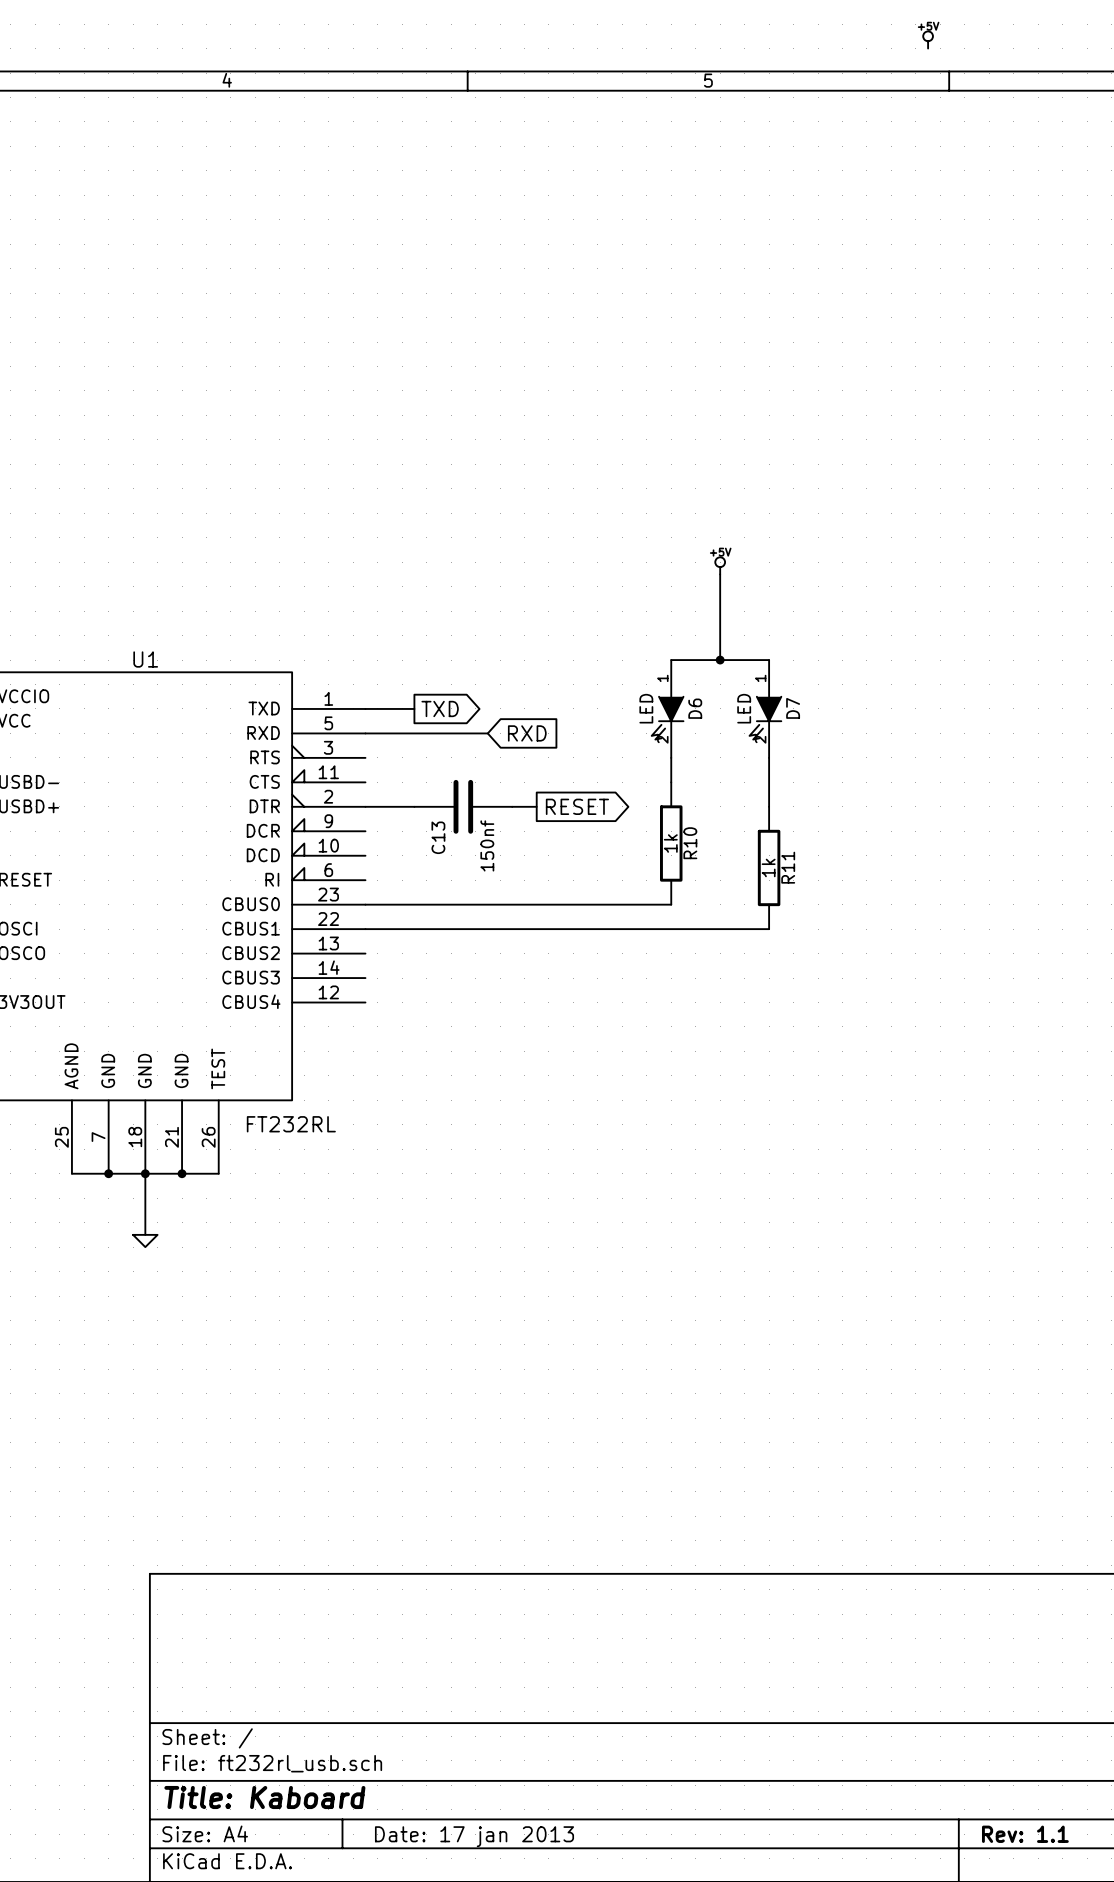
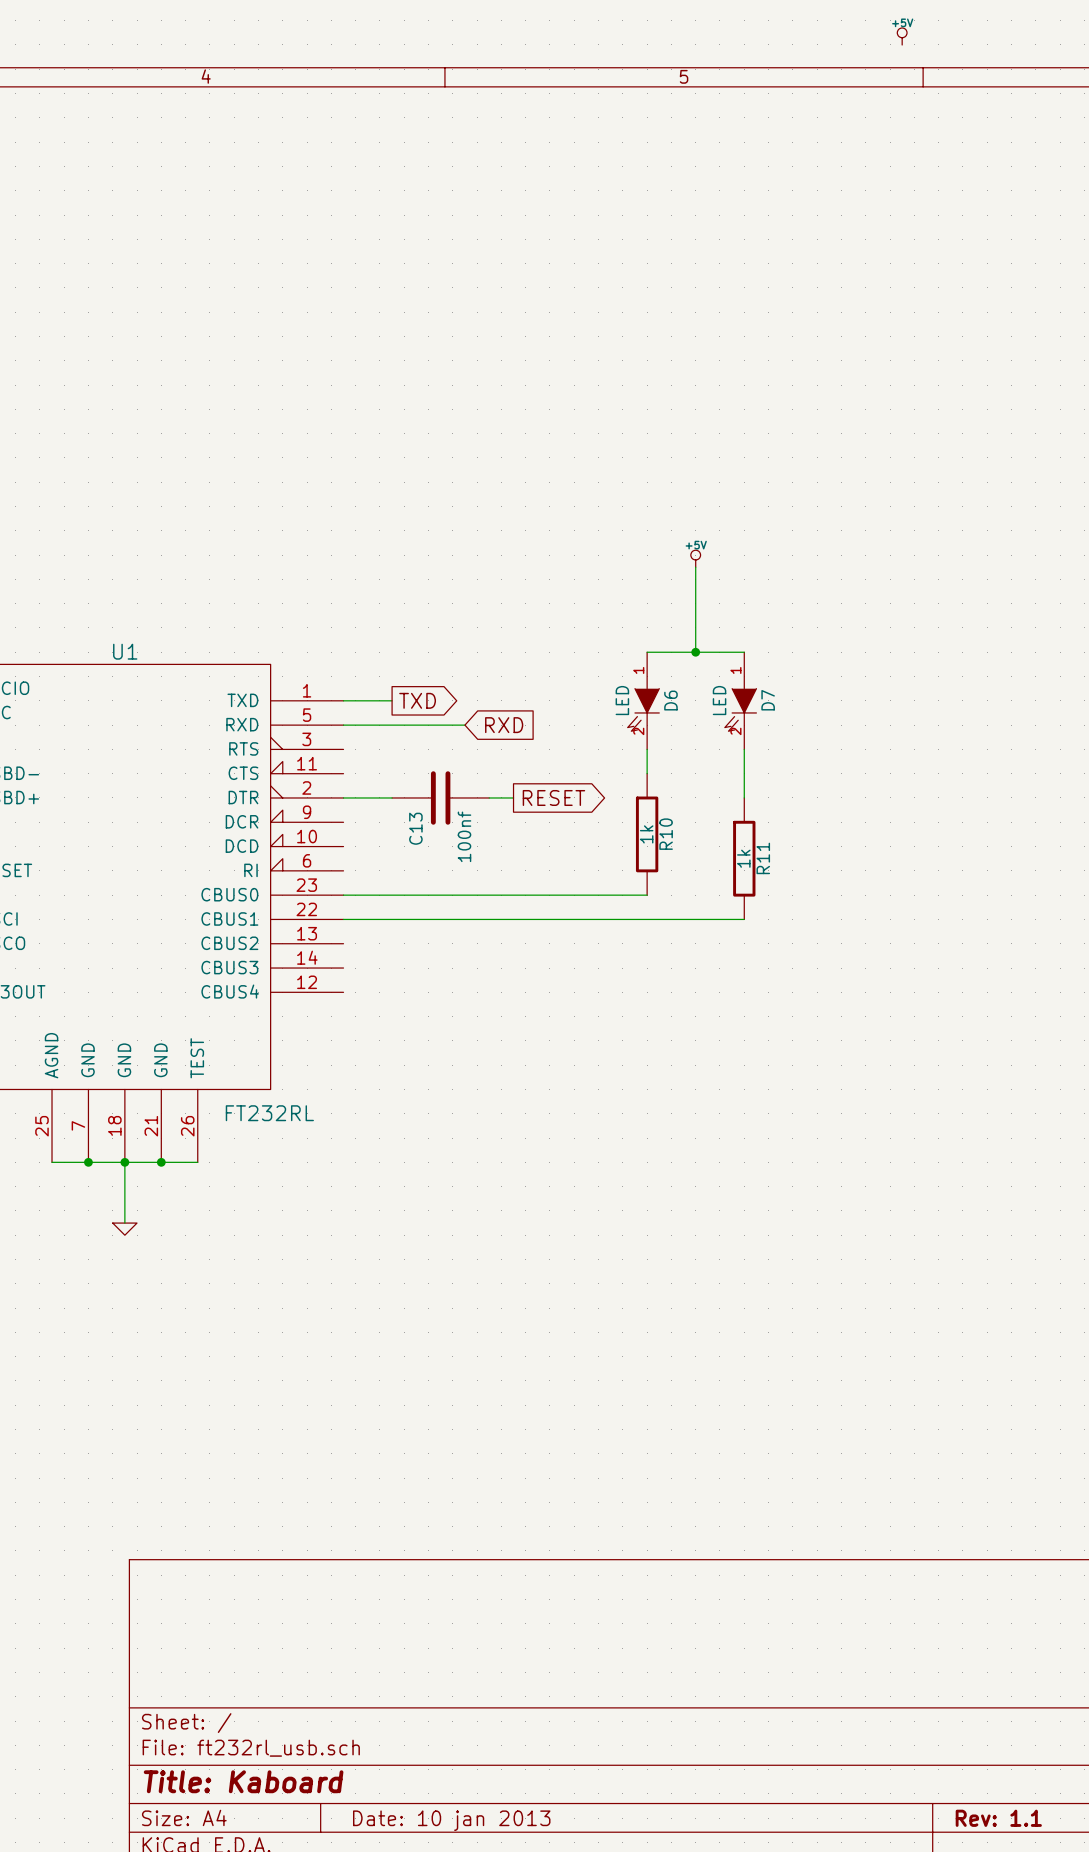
C13 value: 150nf (487, 845) -> 100nf (464, 836)
title block: Date: 17 jan 2013 (474, 1836) -> Date: 10 jan 2013 (451, 1820)

